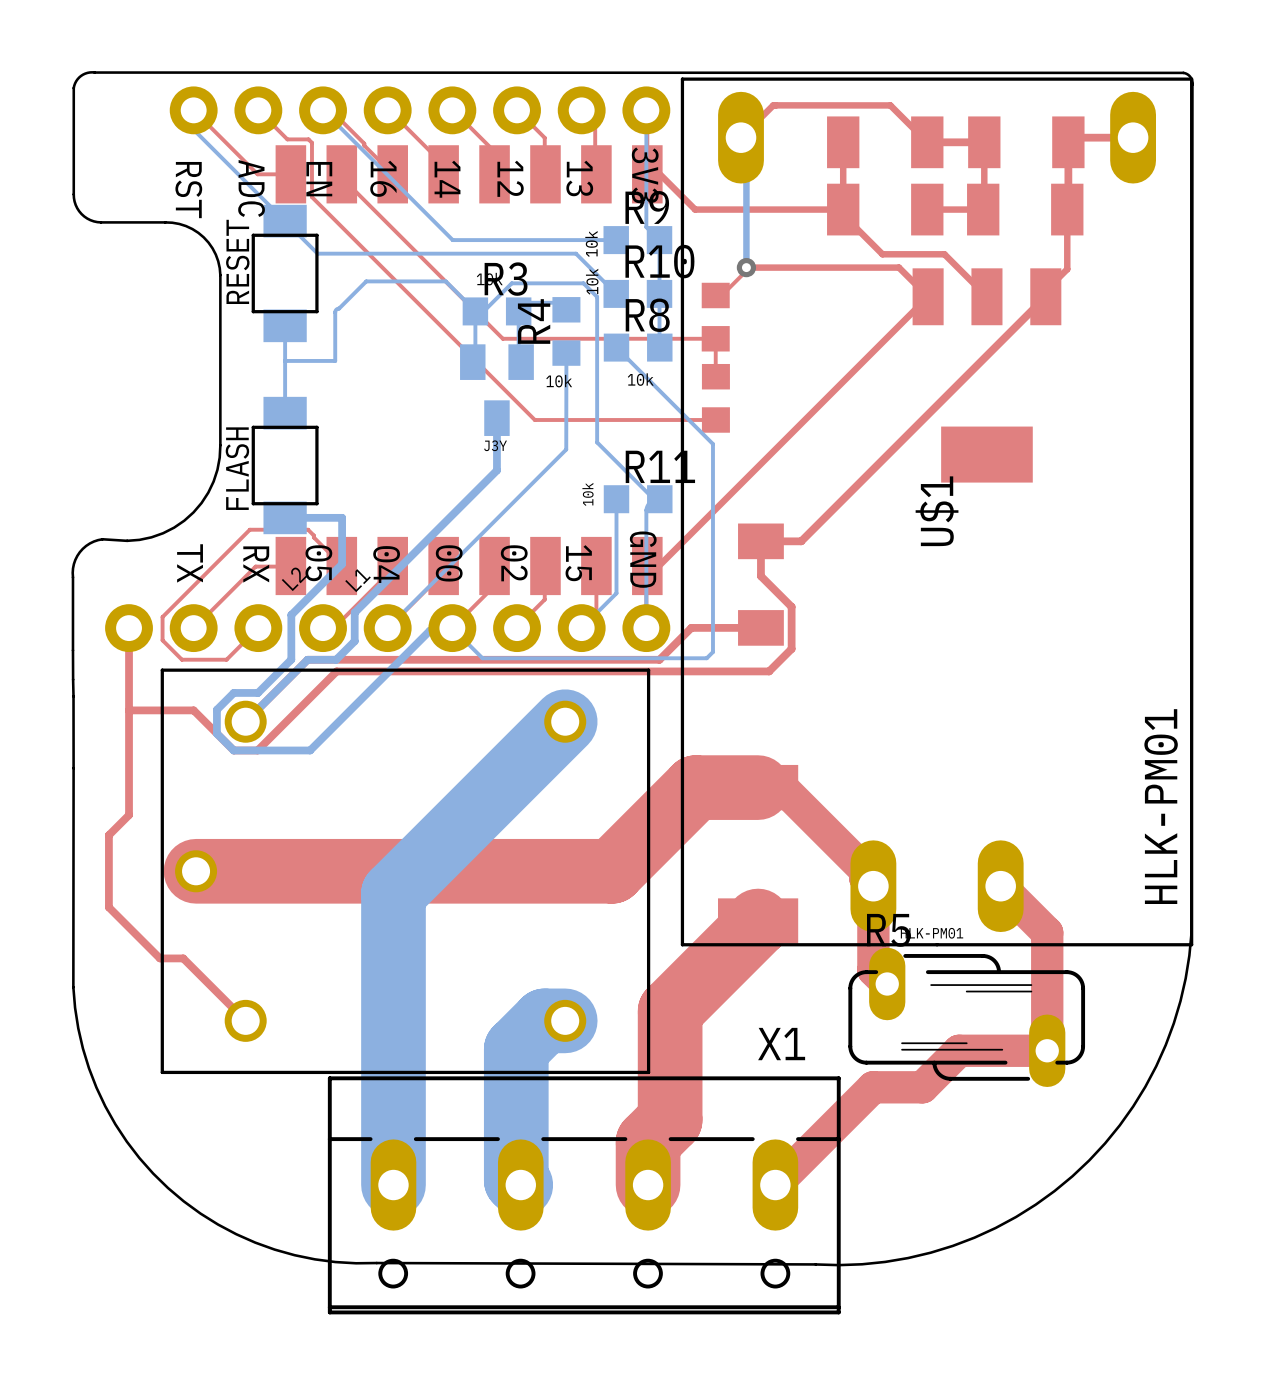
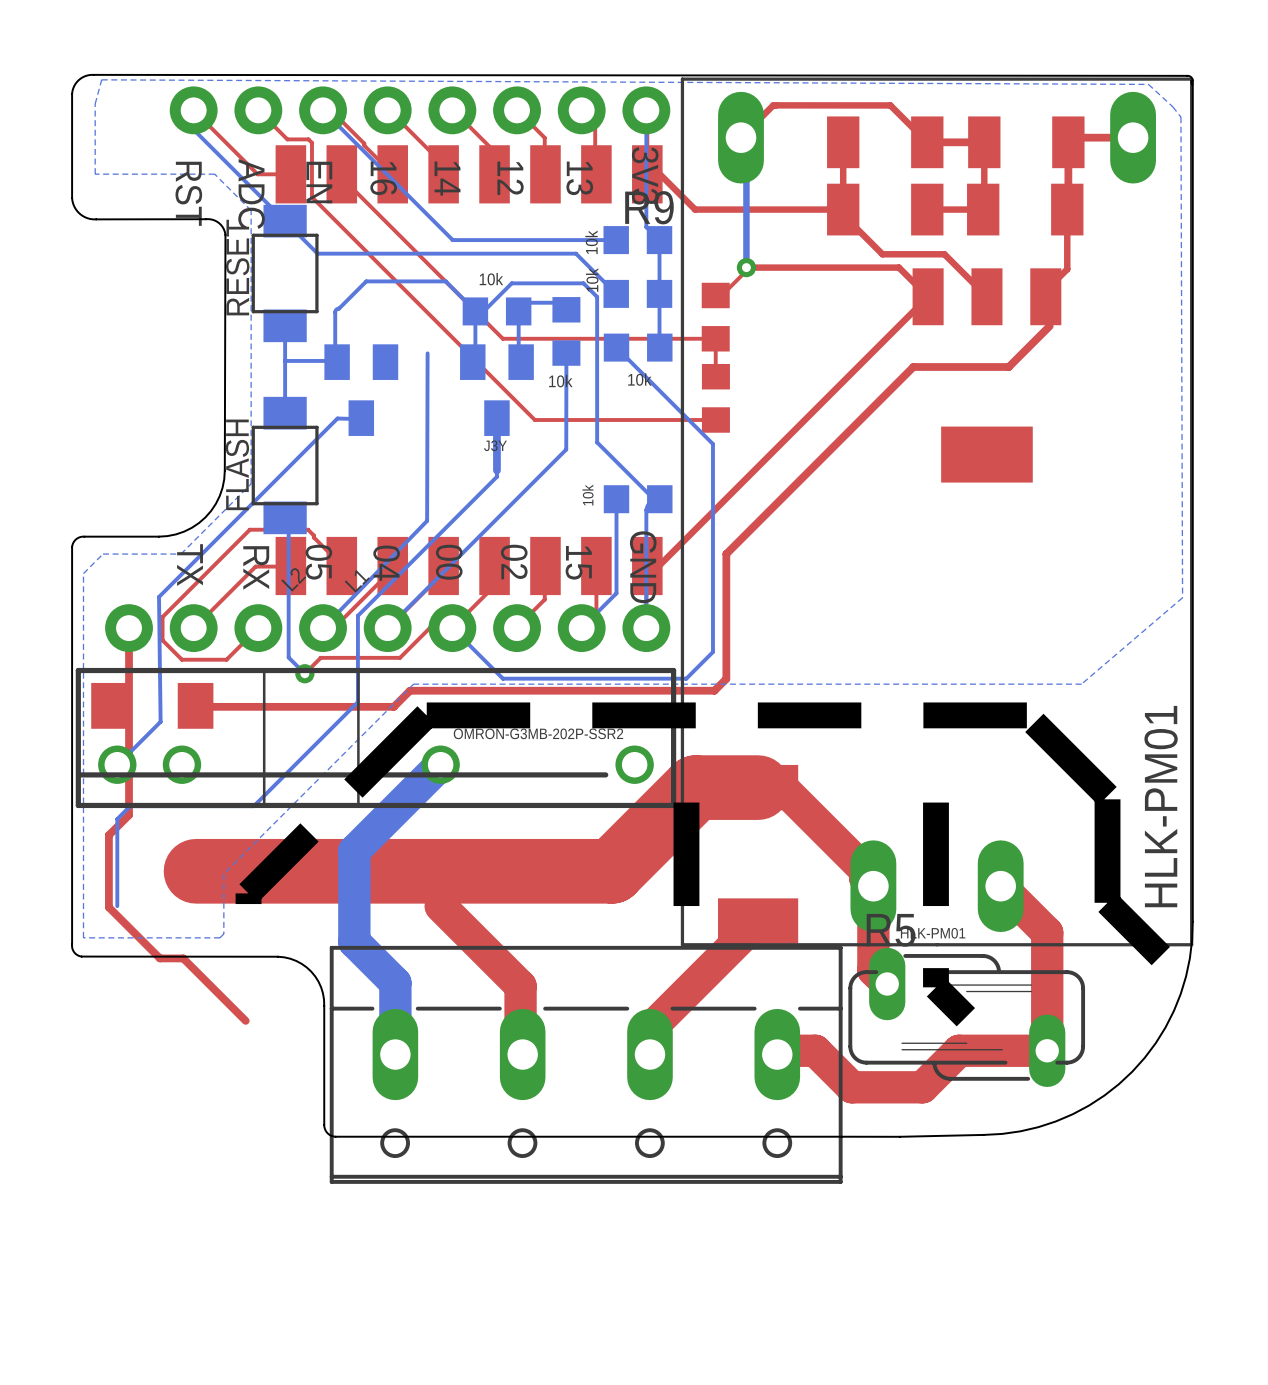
board edge: (94, 72) (1183, 72) (1189, 75) (1192, 83) (1191, 932) (1189, 955) (1180, 1001) (1165, 1045) (1156, 1066) (1133, 1106) (1119, 1125) (1105, 1143) (1072, 1176) (1035, 1204) (1016, 1216) (974, 1237) (930, 1252) (885, 1261) (838, 1265) (356, 1263) (294, 1255) (236, 1234) (183, 1201) (139, 1158) (115, 1124) (96, 1087) (82, 1048) (75, 1007) (73, 987) (73, 568) (79, 552) (93, 541) (102, 539) (139, 539) (163, 533) (174, 527) (193, 512) (208, 492) (217, 469) (219, 457) (220, 275) (218, 261) (212, 248) (203, 237) (192, 229) (172, 222) (97, 222) (84, 216) (77, 208) (73, 194) (73, 88) (81, 75) (94, 72) -> (93, 74) (1187, 75) (1191, 77) (1192, 940) (1186, 976) (1173, 1011) (1155, 1043) (1132, 1071) (1104, 1095) (1072, 1114) (1038, 1127) (1002, 1133) (899, 1136) (334, 1136) (327, 1133) (324, 1126) (323, 993) (315, 976) (301, 963) (290, 958) (278, 956) (81, 956) (75, 953) (72, 945) (72, 544) (76, 539) (82, 536) (158, 536) (184, 531) (199, 523) (215, 503) (222, 487) (224, 470) (224, 230) (219, 223) (210, 219) (93, 219) (84, 217) (77, 211) (72, 198) (72, 93) (74, 86) (79, 79) (85, 75) (93, 74)
bottom zone outline: none -> (101, 79) (95, 103) (95, 174) (214, 174) (251, 210) (251, 483) (180, 554) (102, 554) (83, 573) (83, 937) (219, 937) (223, 933) (223, 873) (413, 684) (1081, 684) (1182, 597) (1180, 117) (1172, 106) (1148, 84) (101, 79)
R10 name: R10 (659, 261) -> none
R3 name: R3 (506, 279) -> none
top track: none -> (1049, 279) (1049, 293) (1045, 296) (1049, 300) (1049, 326) (1008, 366) (913, 366) (726, 554) (726, 678) (714, 690) (409, 690) (393, 706) (195, 705)
top track: (1045, 296) (801, 541) (760, 541) (760, 576) (791, 606) (791, 648) (769, 671) (336, 671) (257, 750) (233, 750) (193, 710) (129, 710) -> none
R8 name: R8 (647, 315) -> none
R4 name: R4 (534, 321) -> none
bottom track: none -> (427, 353) (427, 520) (323, 628)
part: none -> (361, 390)
bottom track: none -> (361, 418) (337, 418) (159, 596) (160, 721) (117, 764)
R11 name: R11 (660, 466) -> none
bottom track: (496, 470) (354, 612) (354, 641) (336, 659) (307, 659) (245, 721) -> (496, 470) (496, 476) (357, 615) (357, 702) (253, 806) (130, 806) (117, 819) (117, 906)
U$1 name: U$1 (937, 511) -> none
bottom track: none -> (285, 517) (288, 518) (288, 657) (304, 673)
bottom track: (291, 524) (285, 517) (342, 517) (342, 564) (291, 614) (291, 659) (257, 692) (233, 692) (216, 709) (216, 733) (233, 750) (310, 750) (429, 630) (454, 630) -> none
part rotation: 0° (760, 584) -> 90° clockwise (152, 705)
part position: (760, 584) -> (152, 705)
top track: (760, 627) (691, 627) (659, 659) (307, 659) (245, 721) -> none
top track: none -> (452, 628) (429, 628) (400, 657) (320, 657) (304, 673)
bottom track: (706, 658) (482, 658) -> (706, 658) (686, 678) (502, 678) (482, 658)
via: none -> (304, 673)
bottom track: (565, 721) (393, 893) (393, 1185) -> none
part: none -> OMRON-G3MB-202P-SSR2 (375, 737)
bottom track: none -> (440, 764) (354, 851) (354, 941) (395, 982) (395, 1054)
board edge: none -> (686, 802) (686, 926)
board edge: none -> (935, 802) (935, 987) (965, 1017)
part: (405, 871) -> none
board edge: none -> (248, 904) (248, 893) (426, 715) (1026, 715) (1107, 796) (1107, 902) (1160, 956)
top track: none -> (440, 906) (520, 986) (520, 1052) (522, 1054)
top track: (758, 921) (758, 923) (670, 1011) (670, 1120) (648, 1142) (648, 1185) -> (758, 921) (649, 1029) (649, 1054)
bottom track: (565, 1020) (544, 1020) (516, 1049) (516, 1180) (520, 1185) -> none
part: none -> (586, 1064)
top track: (873, 1087) (775, 1185) -> (873, 1087) (851, 1087) (815, 1050) (781, 1050) (777, 1054)
X1: (584, 1195) -> none

